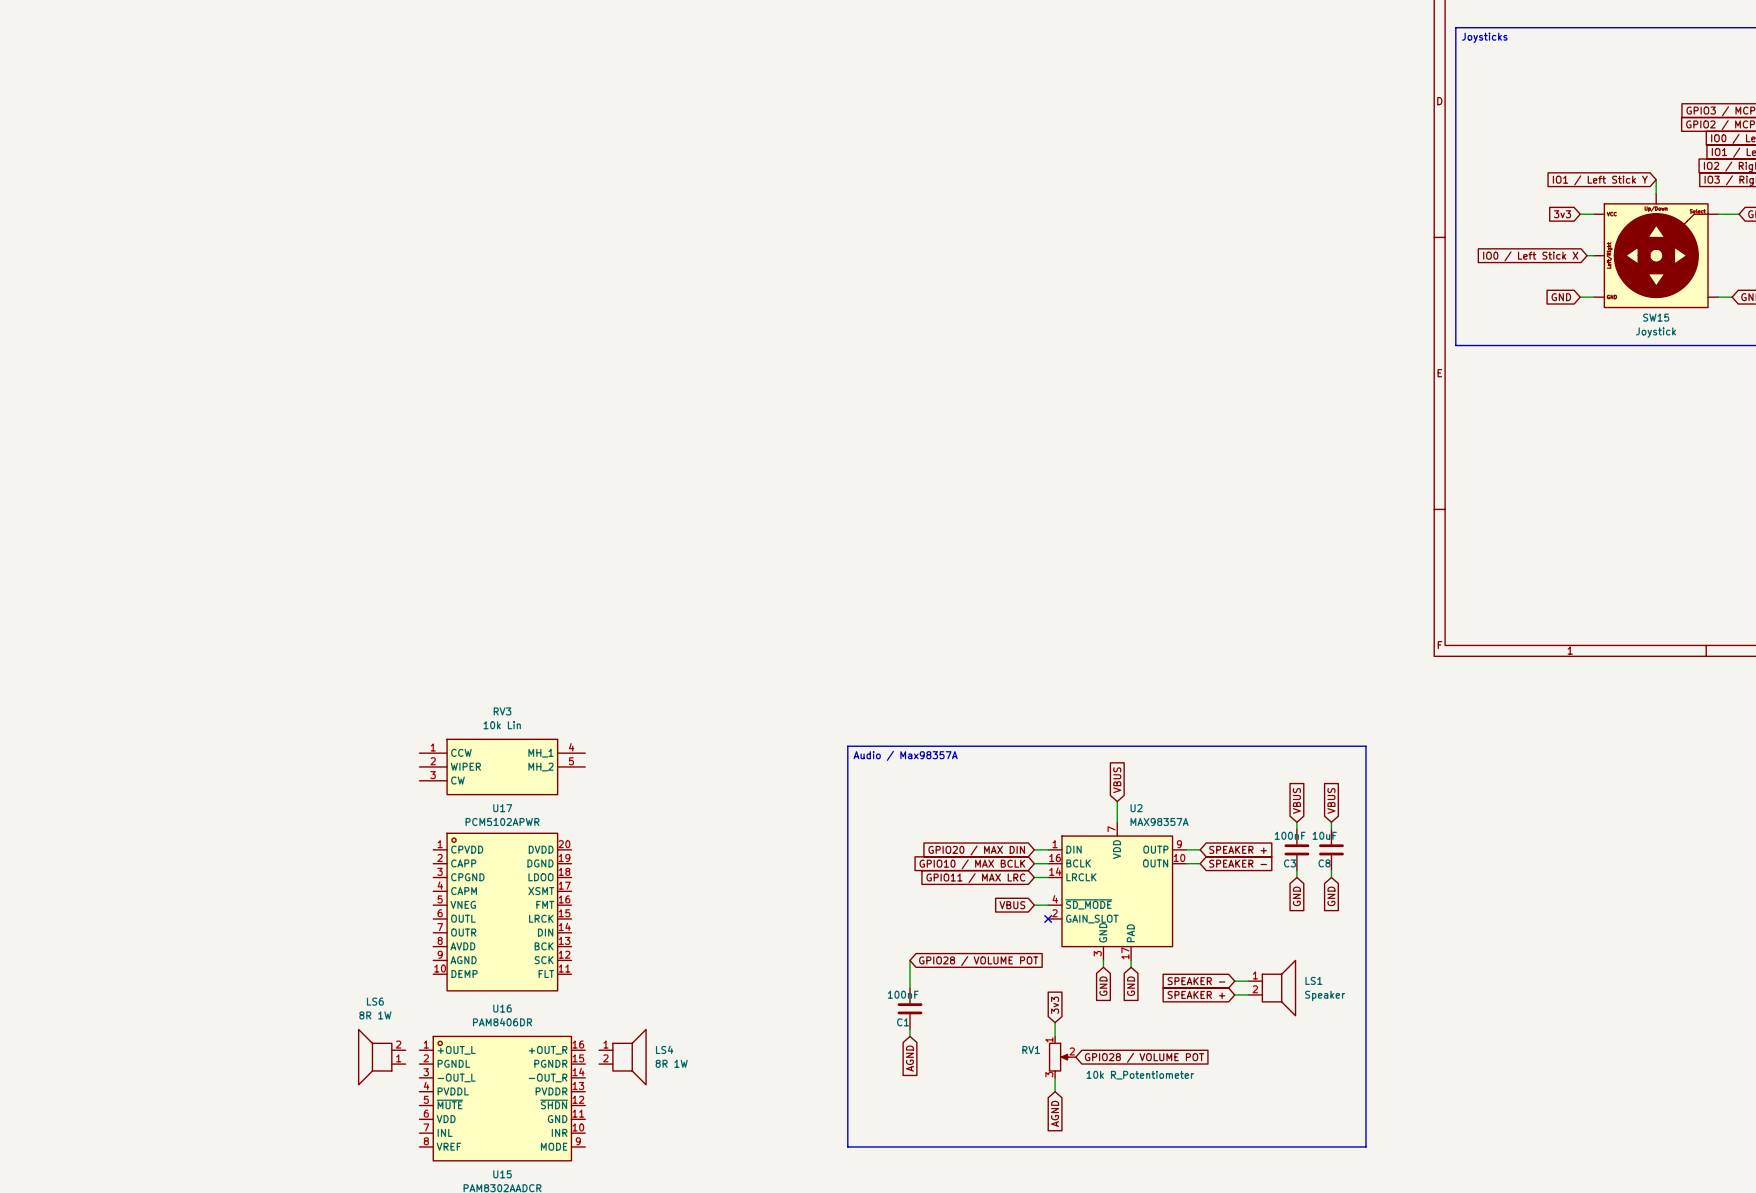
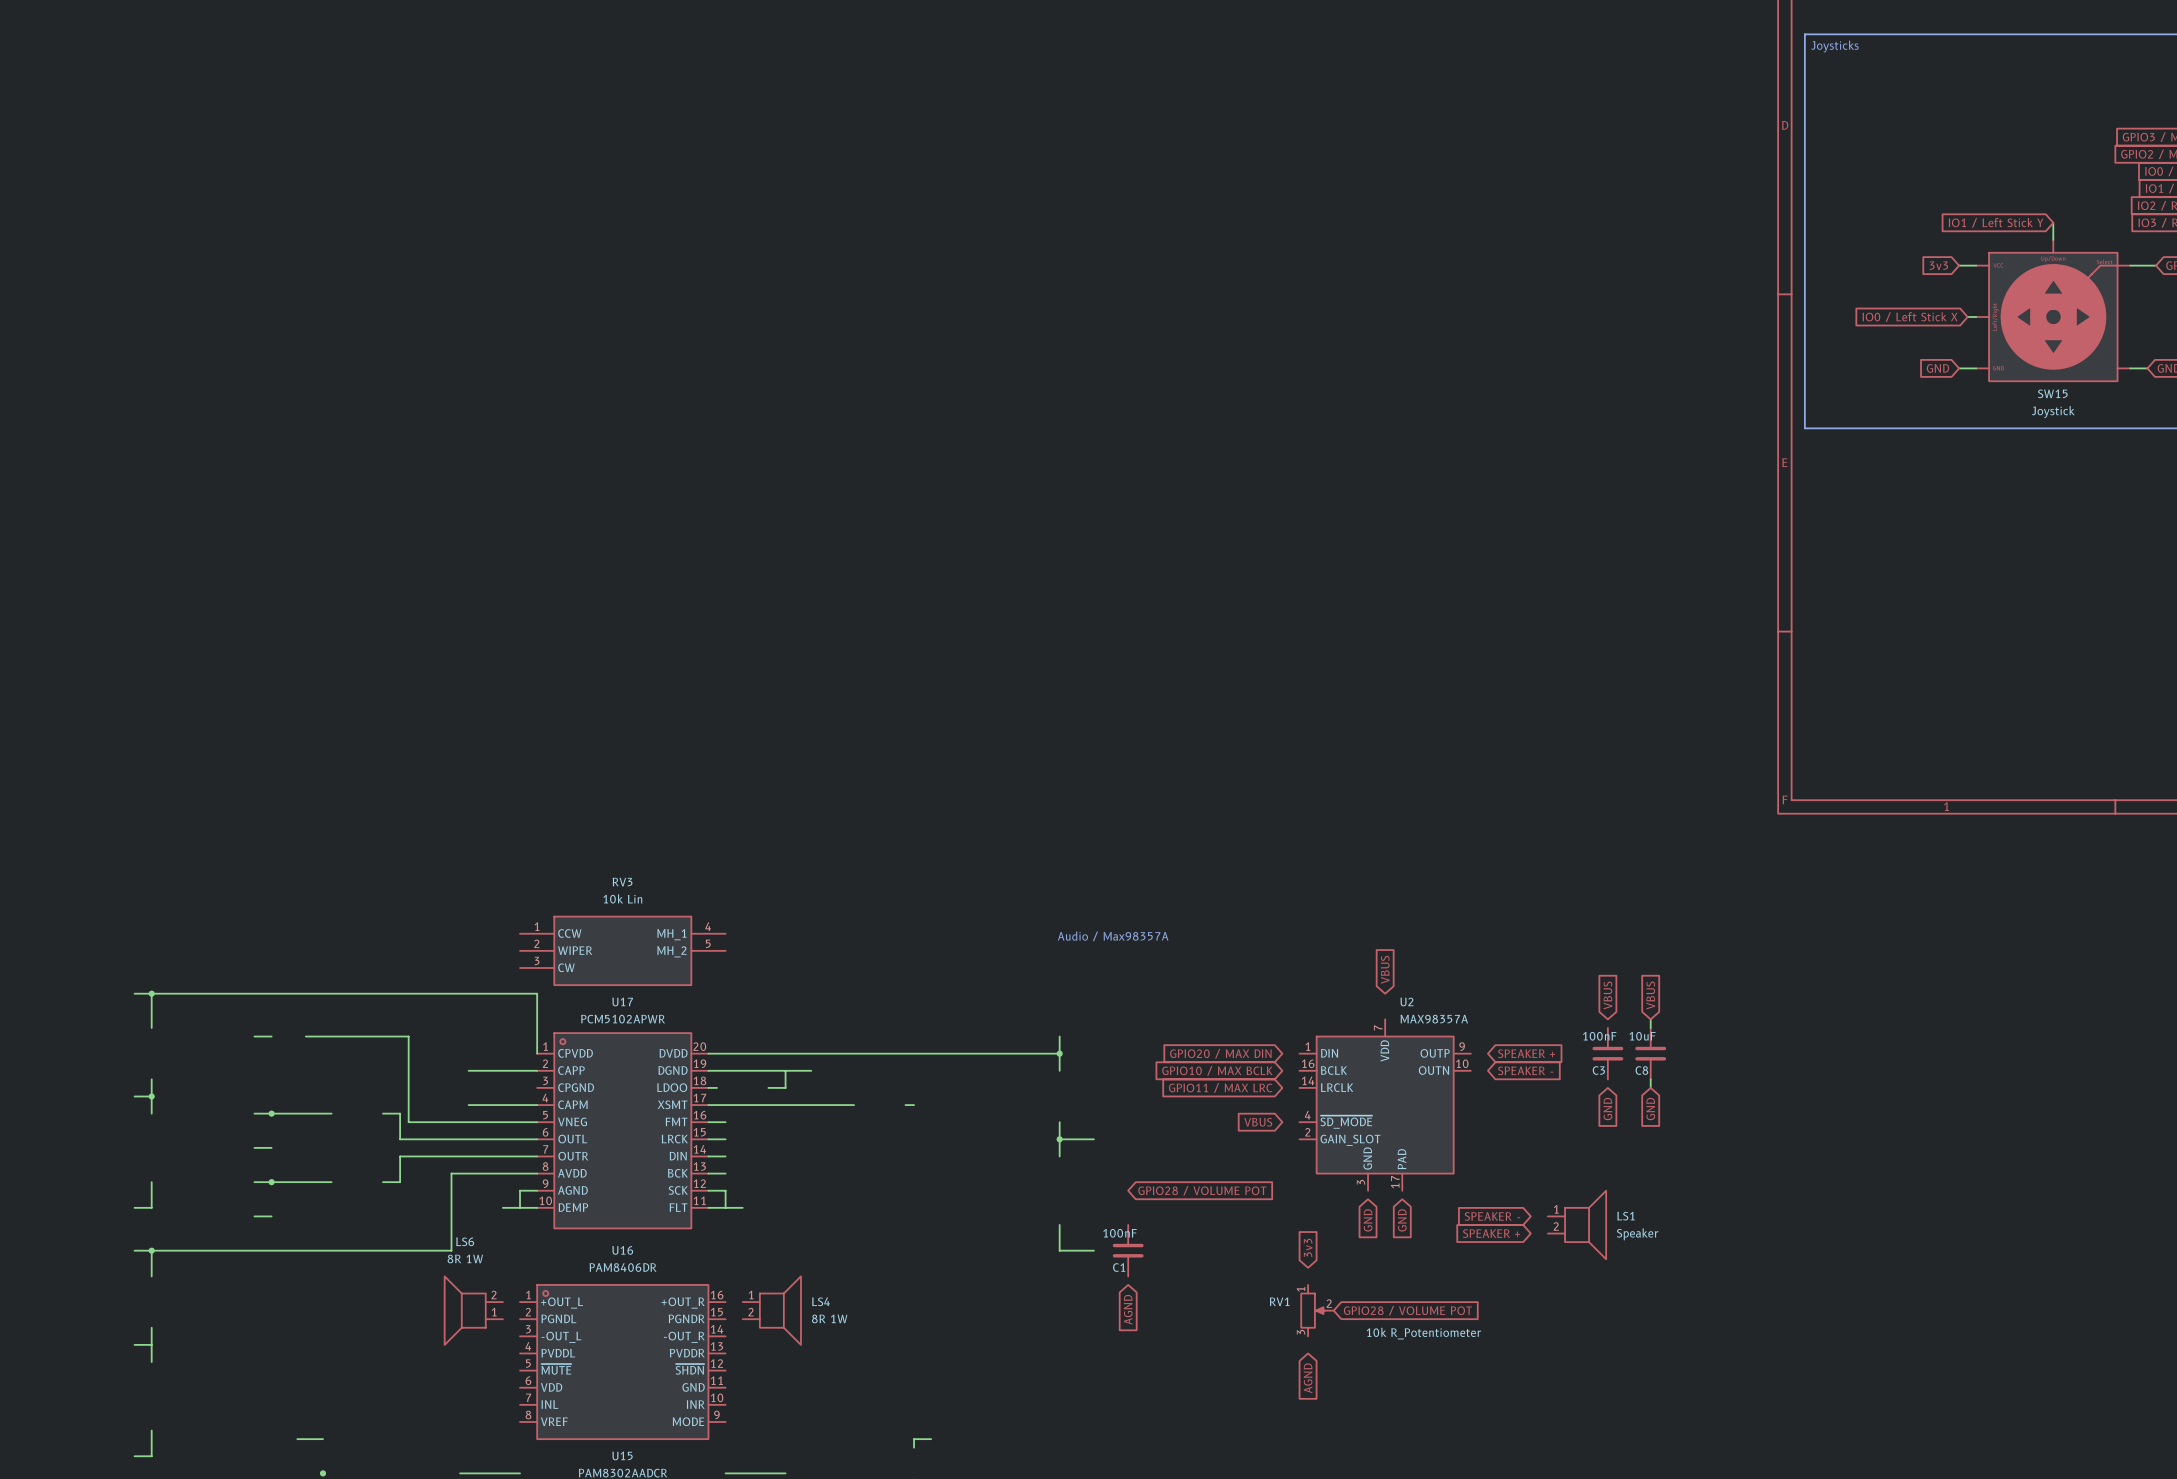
line: (847, 746) (1365, 746) (1365, 1146) (847, 1146) (847, 746) -> none
wire: none -> (134, 993) (537, 993) (537, 1053)
wire: none -> (151, 993) (151, 1027)
junction: none -> (151, 993)
wire: (1117, 801) (1117, 822) -> none
wire: (1296, 822) (1296, 829) -> none
wire: none -> (254, 1036) (271, 1036)
wire: none -> (305, 1036) (408, 1036) (408, 1122) (537, 1122)
wire: none -> (1059, 1036) (1059, 1070)
wire: none -> (708, 1053) (1059, 1053)
junction: none -> (1059, 1053)
wire: (1034, 849) (1048, 849) -> none
wire: (1186, 849) (1200, 849) -> none
wire: none -> (468, 1070) (537, 1070)
wire: none -> (708, 1070) (811, 1070)
wire: none -> (785, 1070) (785, 1087) (768, 1087)
wire: (1034, 863) (1048, 863) -> none
wire: (1186, 863) (1200, 863) -> none
wire: none -> (151, 1079) (151, 1113)
wire: (1296, 870) (1296, 877) -> none
wire: none -> (708, 1087) (717, 1087)
wire: (1034, 877) (1048, 877) -> none
wire: none -> (134, 1096) (151, 1096)
junction: none -> (151, 1096)
wire: none -> (468, 1105) (537, 1105)
wire: none -> (708, 1105) (854, 1105)
wire: none -> (905, 1105) (914, 1105)
wire: none -> (254, 1113) (331, 1113)
junction: none -> (271, 1113)
wire: none -> (382, 1113) (400, 1113) (400, 1139) (537, 1139)
wire: none -> (708, 1122) (725, 1122)
wire: (1034, 905) (1048, 905) -> none
wire: none -> (708, 1139) (725, 1139)
wire: none -> (1059, 1139) (1093, 1139)
junction: none -> (1059, 1139)
no-connect mark: (1048, 918) -> none
wire: none -> (254, 1147) (271, 1147)
wire: none -> (537, 1156) (400, 1156) (400, 1182) (382, 1182)
wire: none -> (708, 1156) (725, 1156)
wire: none -> (537, 1173) (451, 1173) (451, 1250) (134, 1250)
wire: none -> (708, 1173) (725, 1173)
wire: none -> (151, 1182) (151, 1207) (134, 1207)
wire: none -> (254, 1182) (331, 1182)
junction: none -> (271, 1182)
wire: none -> (537, 1190) (520, 1190) (520, 1207)
wire: none -> (708, 1190) (725, 1190) (725, 1207)
wire: (909, 960) (909, 988) -> (1059, 1122) (1059, 1156)
wire: (1103, 960) (1103, 967) -> none
wire: (1131, 960) (1131, 967) -> none
wire: none -> (502, 1207) (537, 1207)
wire: none -> (708, 1207) (742, 1207)
wire: none -> (254, 1216) (271, 1216)
wire: (1234, 981) (1248, 981) -> none
wire: none -> (1059, 1224) (1059, 1250) (1093, 1250)
wire: (1234, 994) (1248, 994) -> none
wire: none -> (151, 1250) (151, 1276)
junction: none -> (151, 1250)
wire: (1055, 1022) (1055, 1036) -> none
wire: (909, 1029) (909, 1036) -> none
wire: none -> (151, 1327) (151, 1362)
wire: (1055, 1077) (1055, 1091) -> none
wire: none -> (134, 1344) (151, 1344)
wire: none -> (151, 1430) (151, 1456) (134, 1456)
wire: none -> (297, 1439) (323, 1439)
wire: none -> (931, 1439) (914, 1439) (914, 1447)
junction: none -> (323, 1473)
wire: none -> (460, 1473) (520, 1473)
wire: none -> (725, 1473) (785, 1473)

